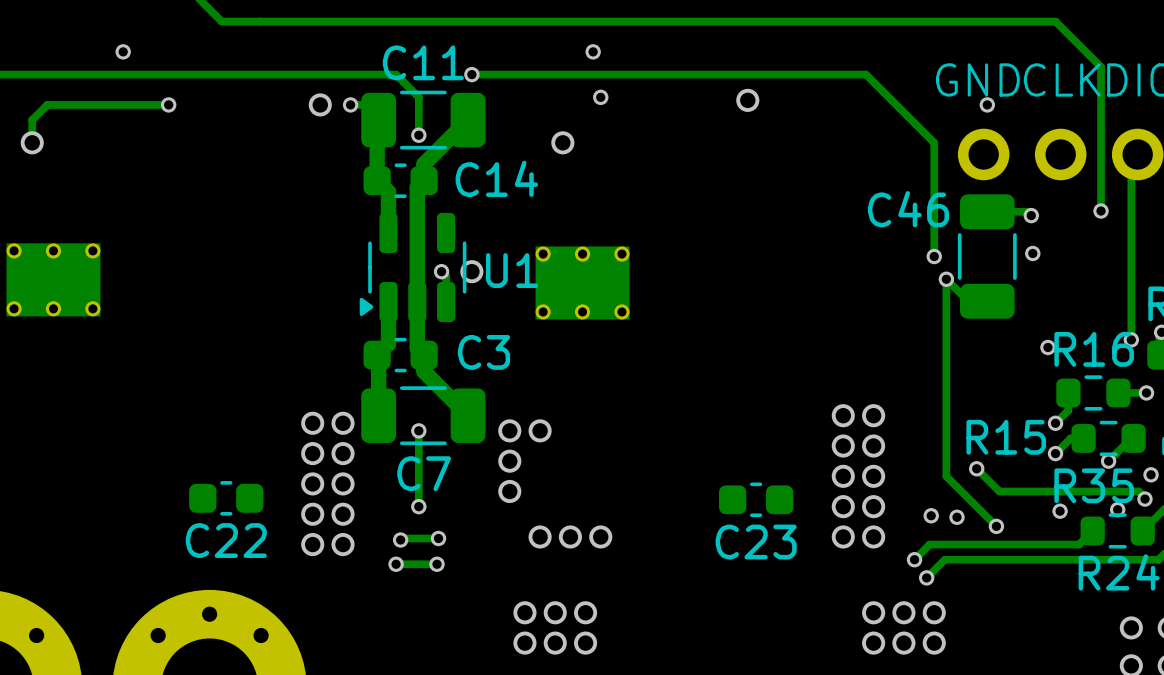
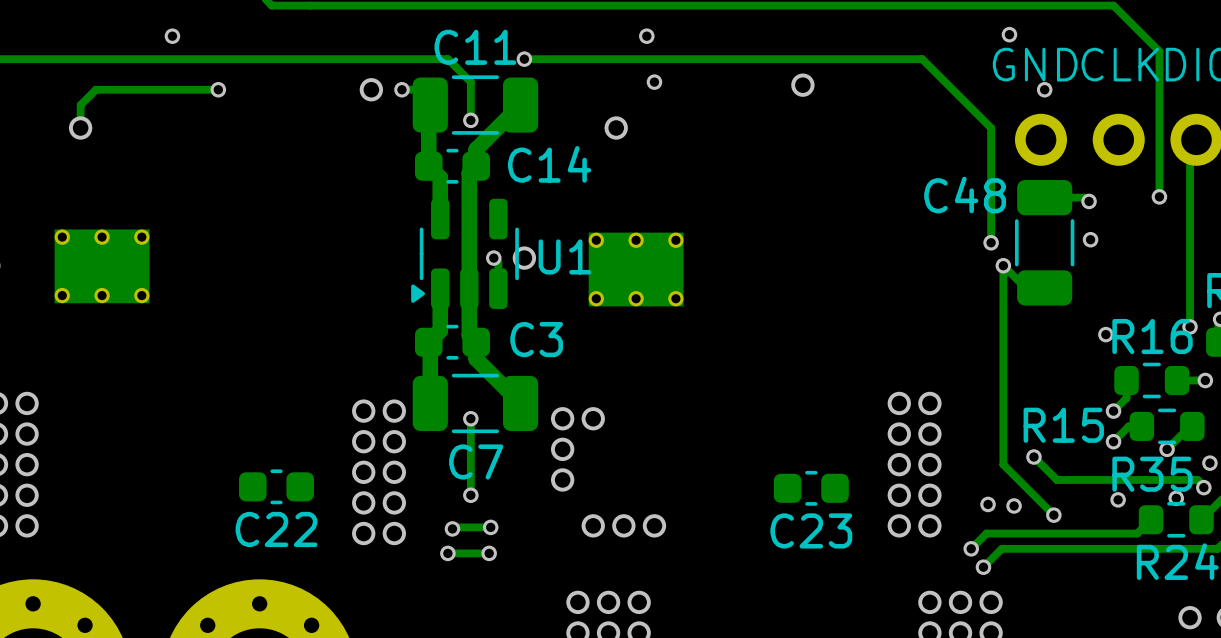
via: none -> (1009, 34)
C46 name: C46 (908, 209) -> C48 (965, 194)

